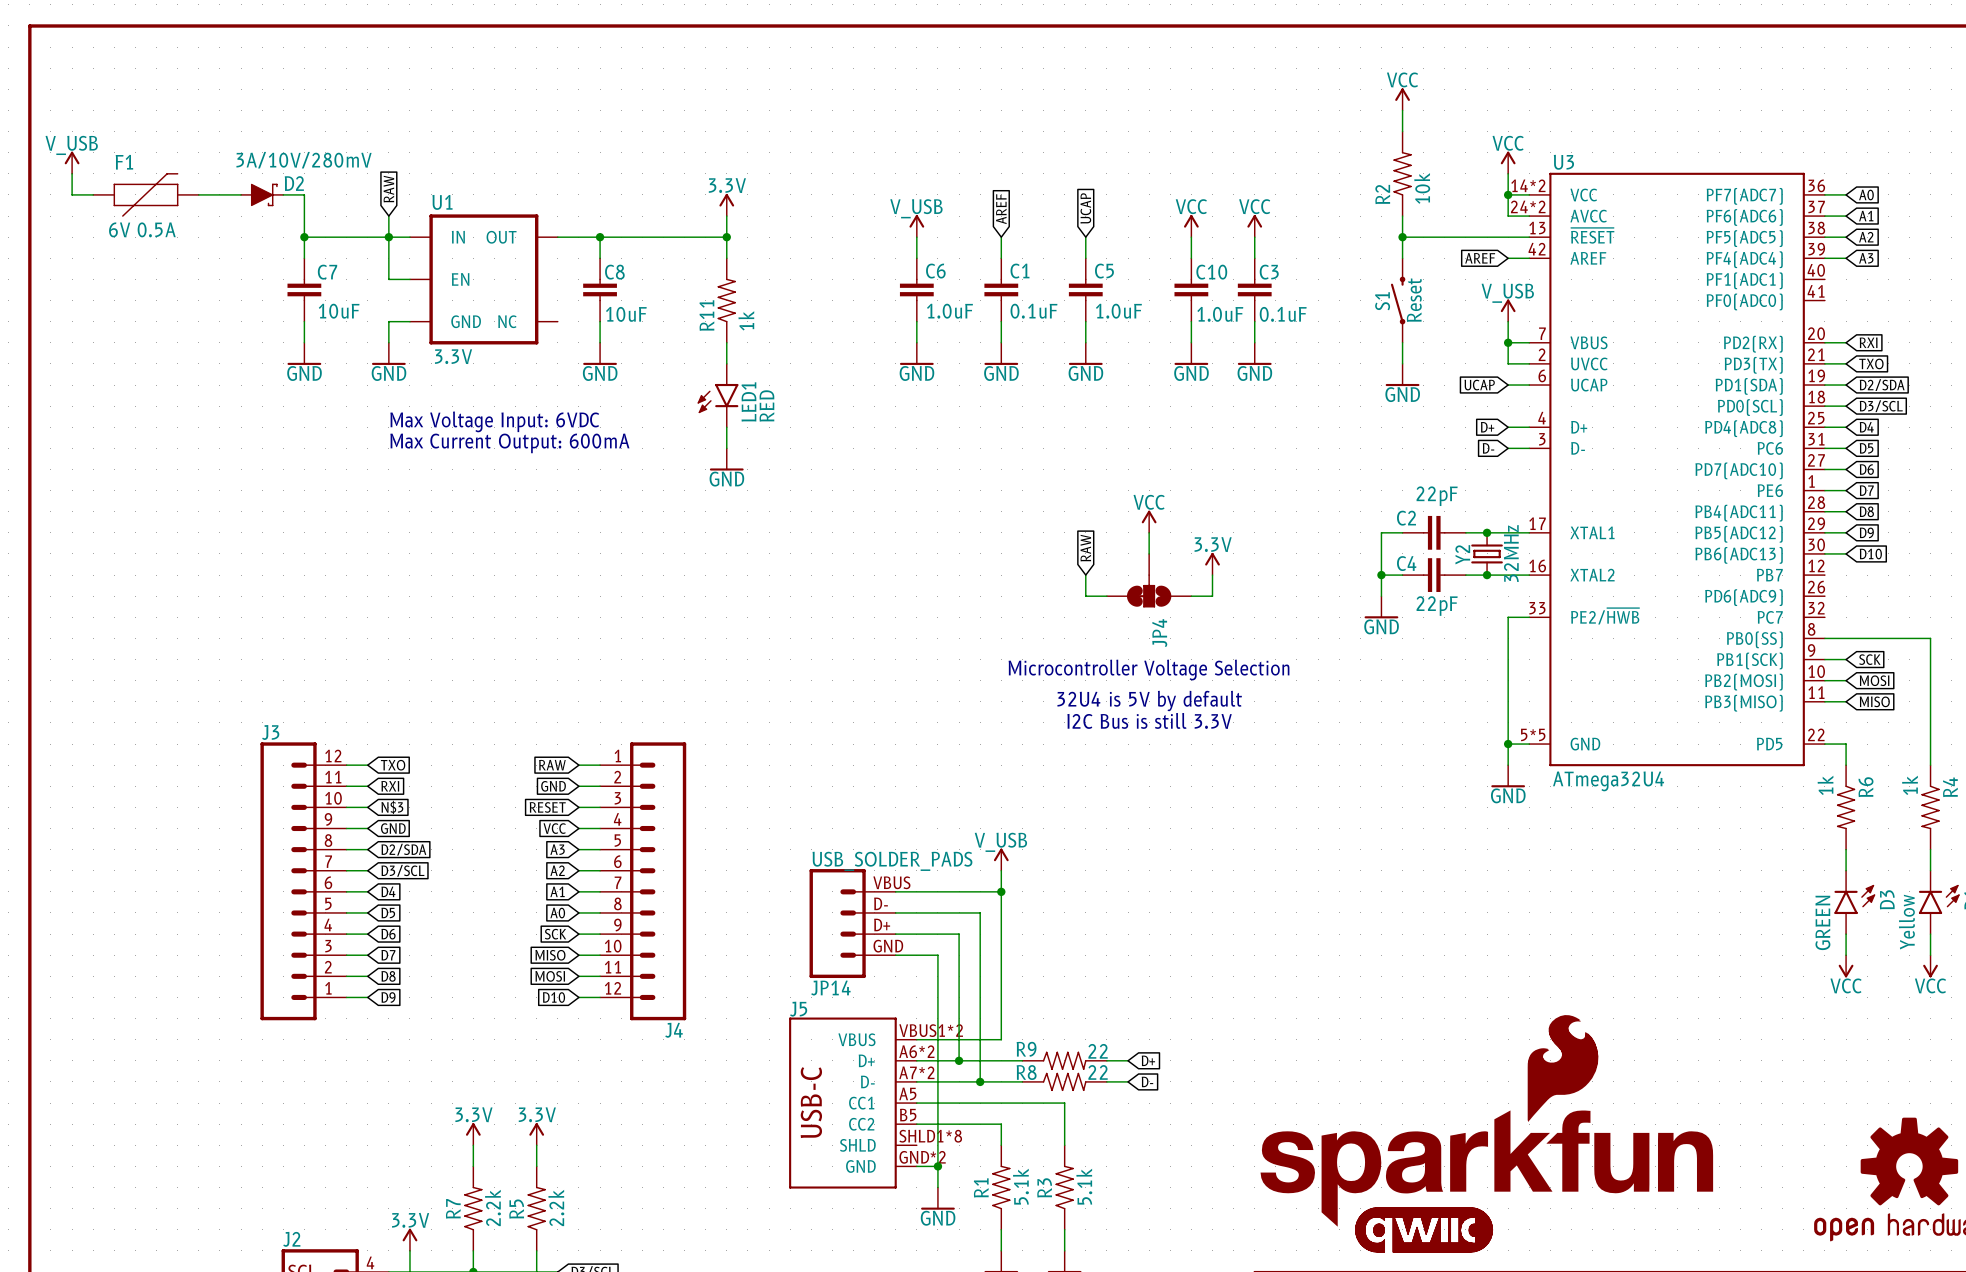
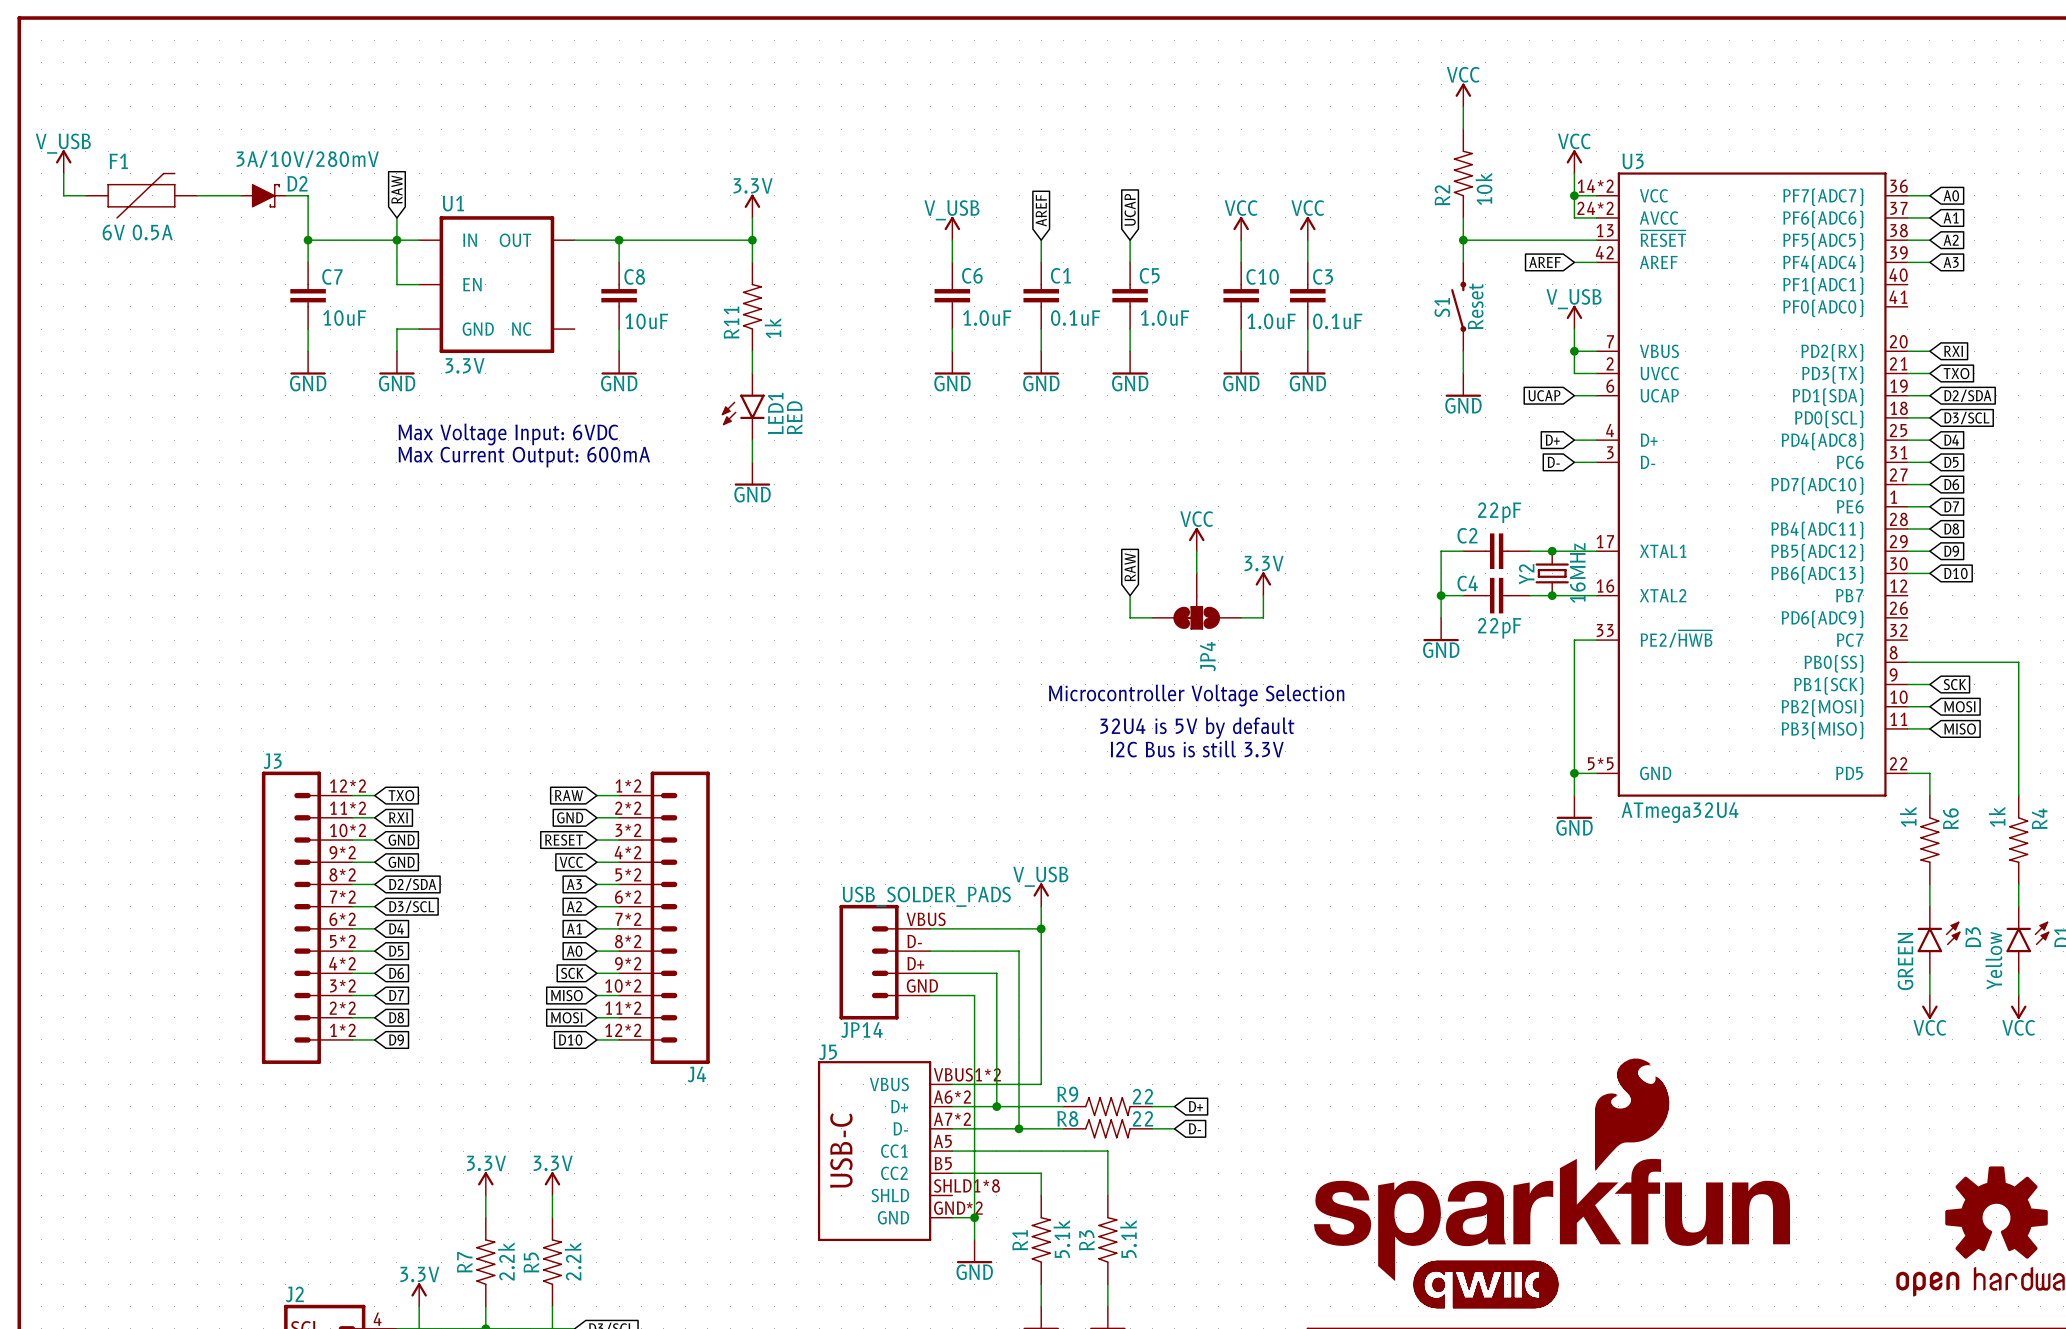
Y2 value: 32MHz (1511, 553) -> 16MHz (1577, 572)
J3 symbol: [260, 742, 347, 1021] -> [261, 771, 353, 1064]
J4 symbol: [600, 742, 687, 1021] -> [619, 771, 710, 1064]
global label: N$3 (392, 807) -> GND (401, 840)

